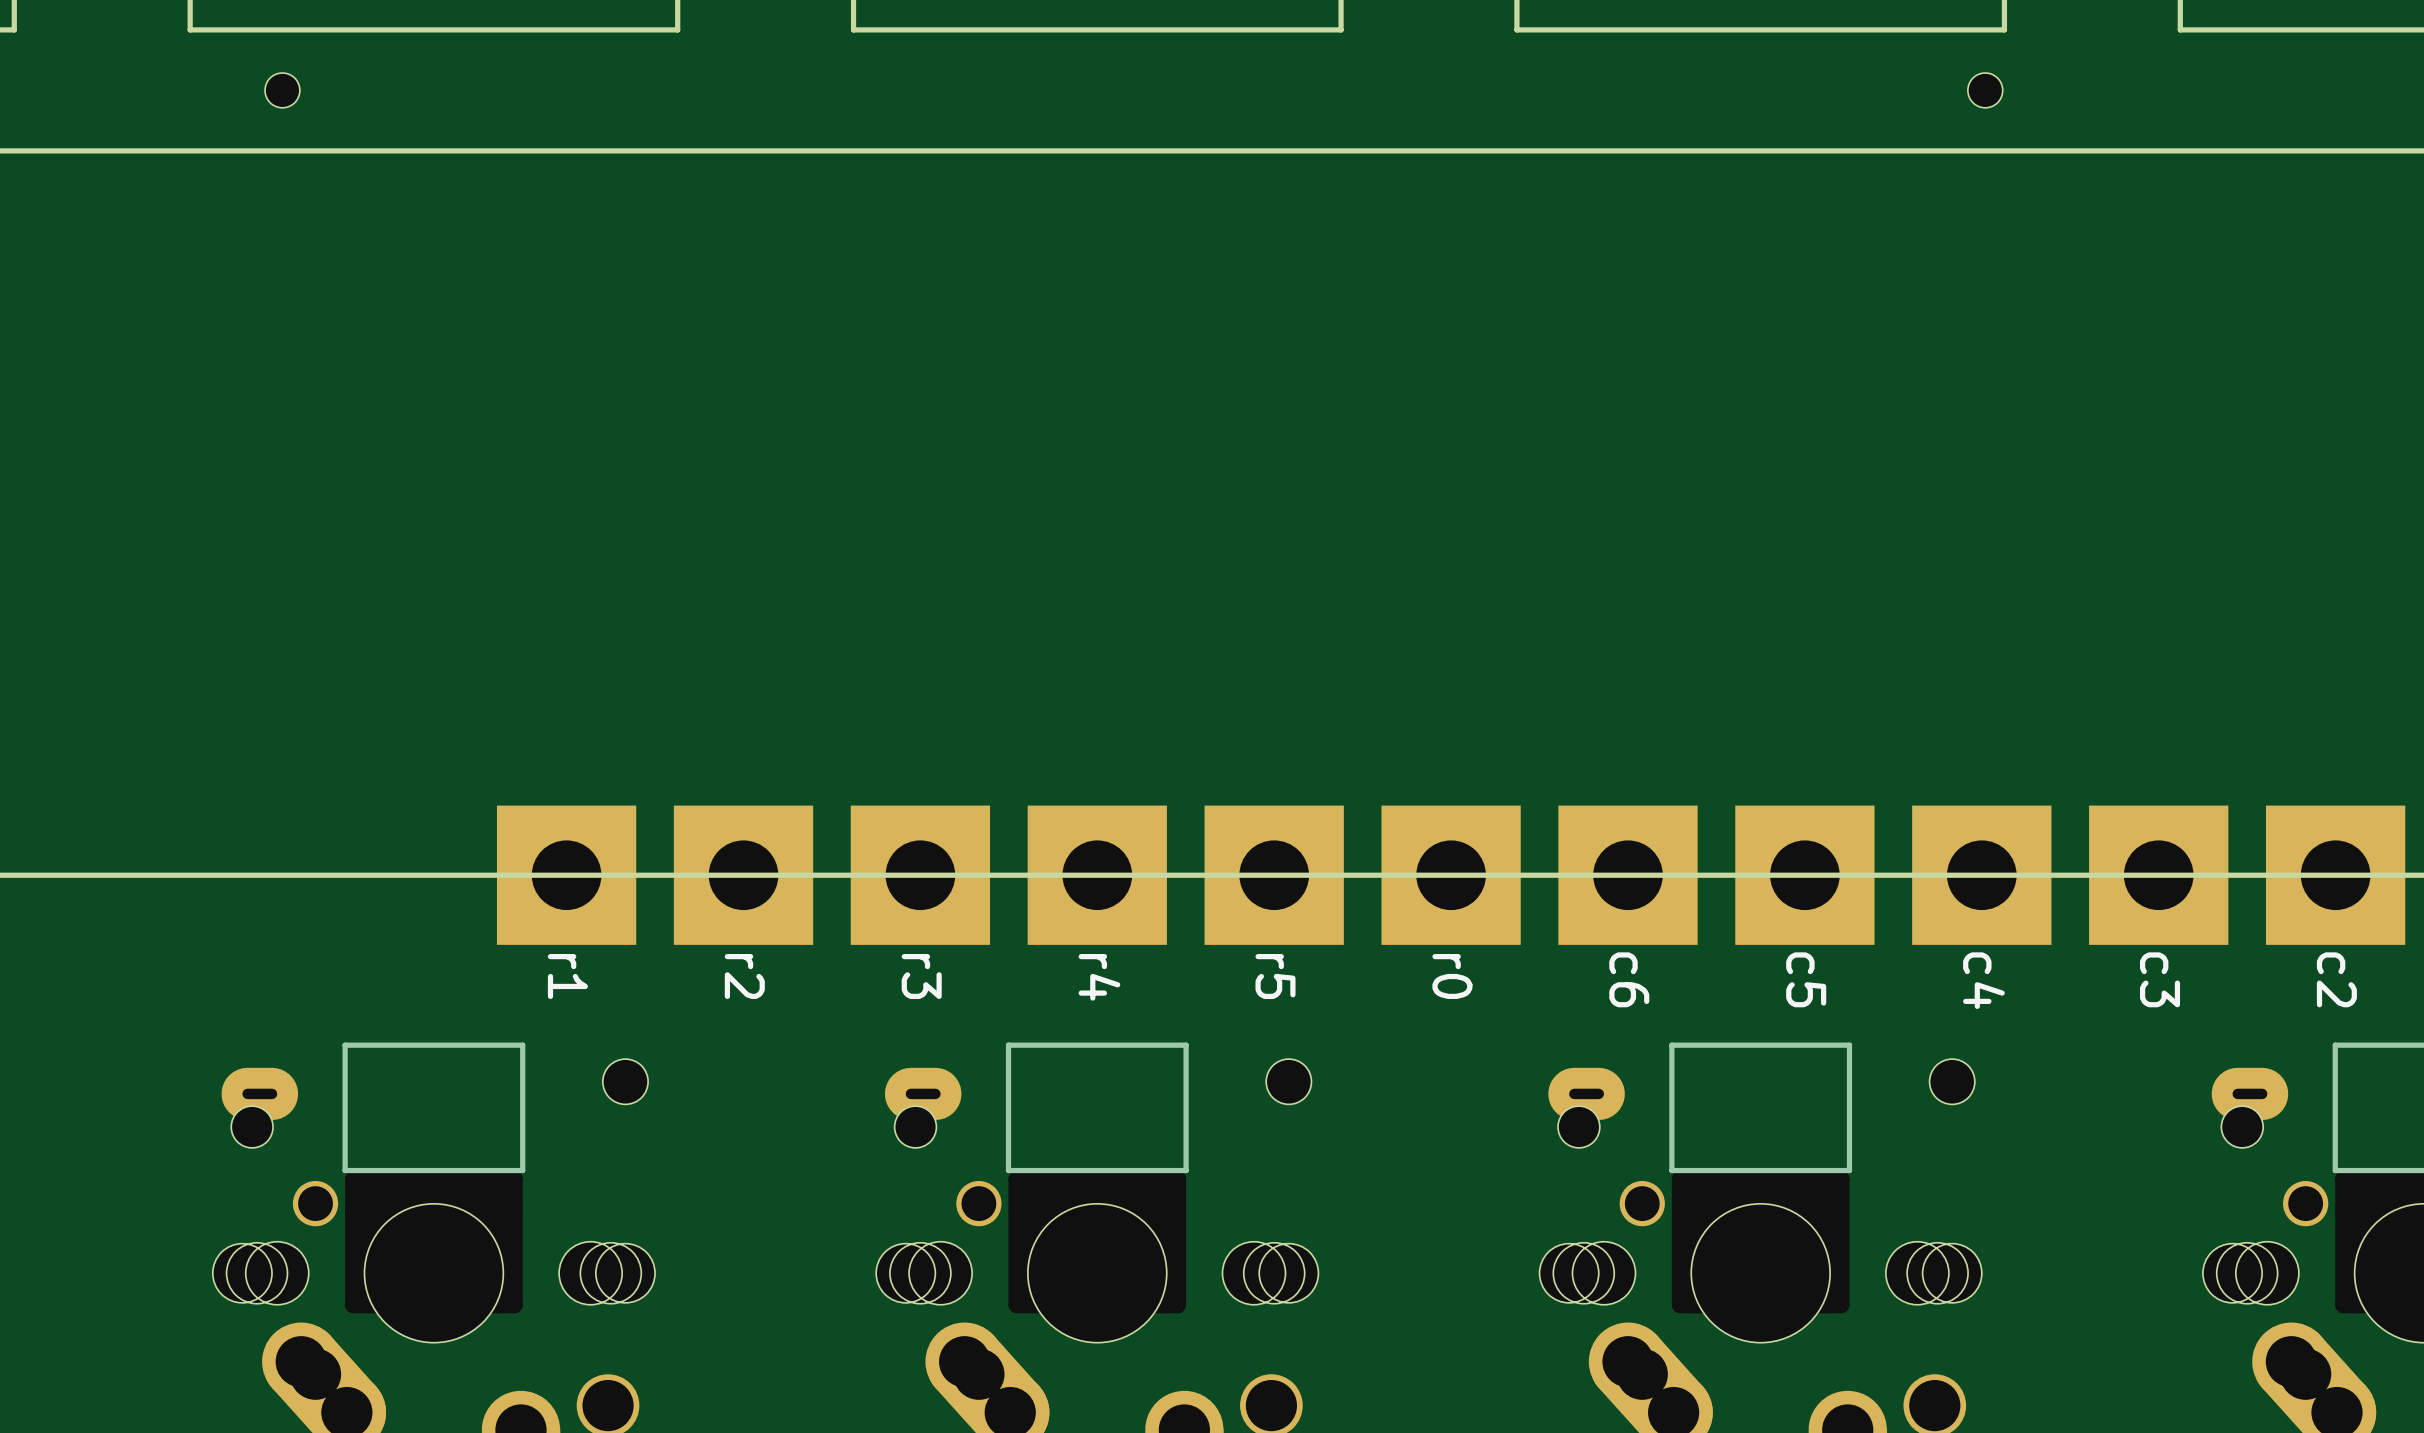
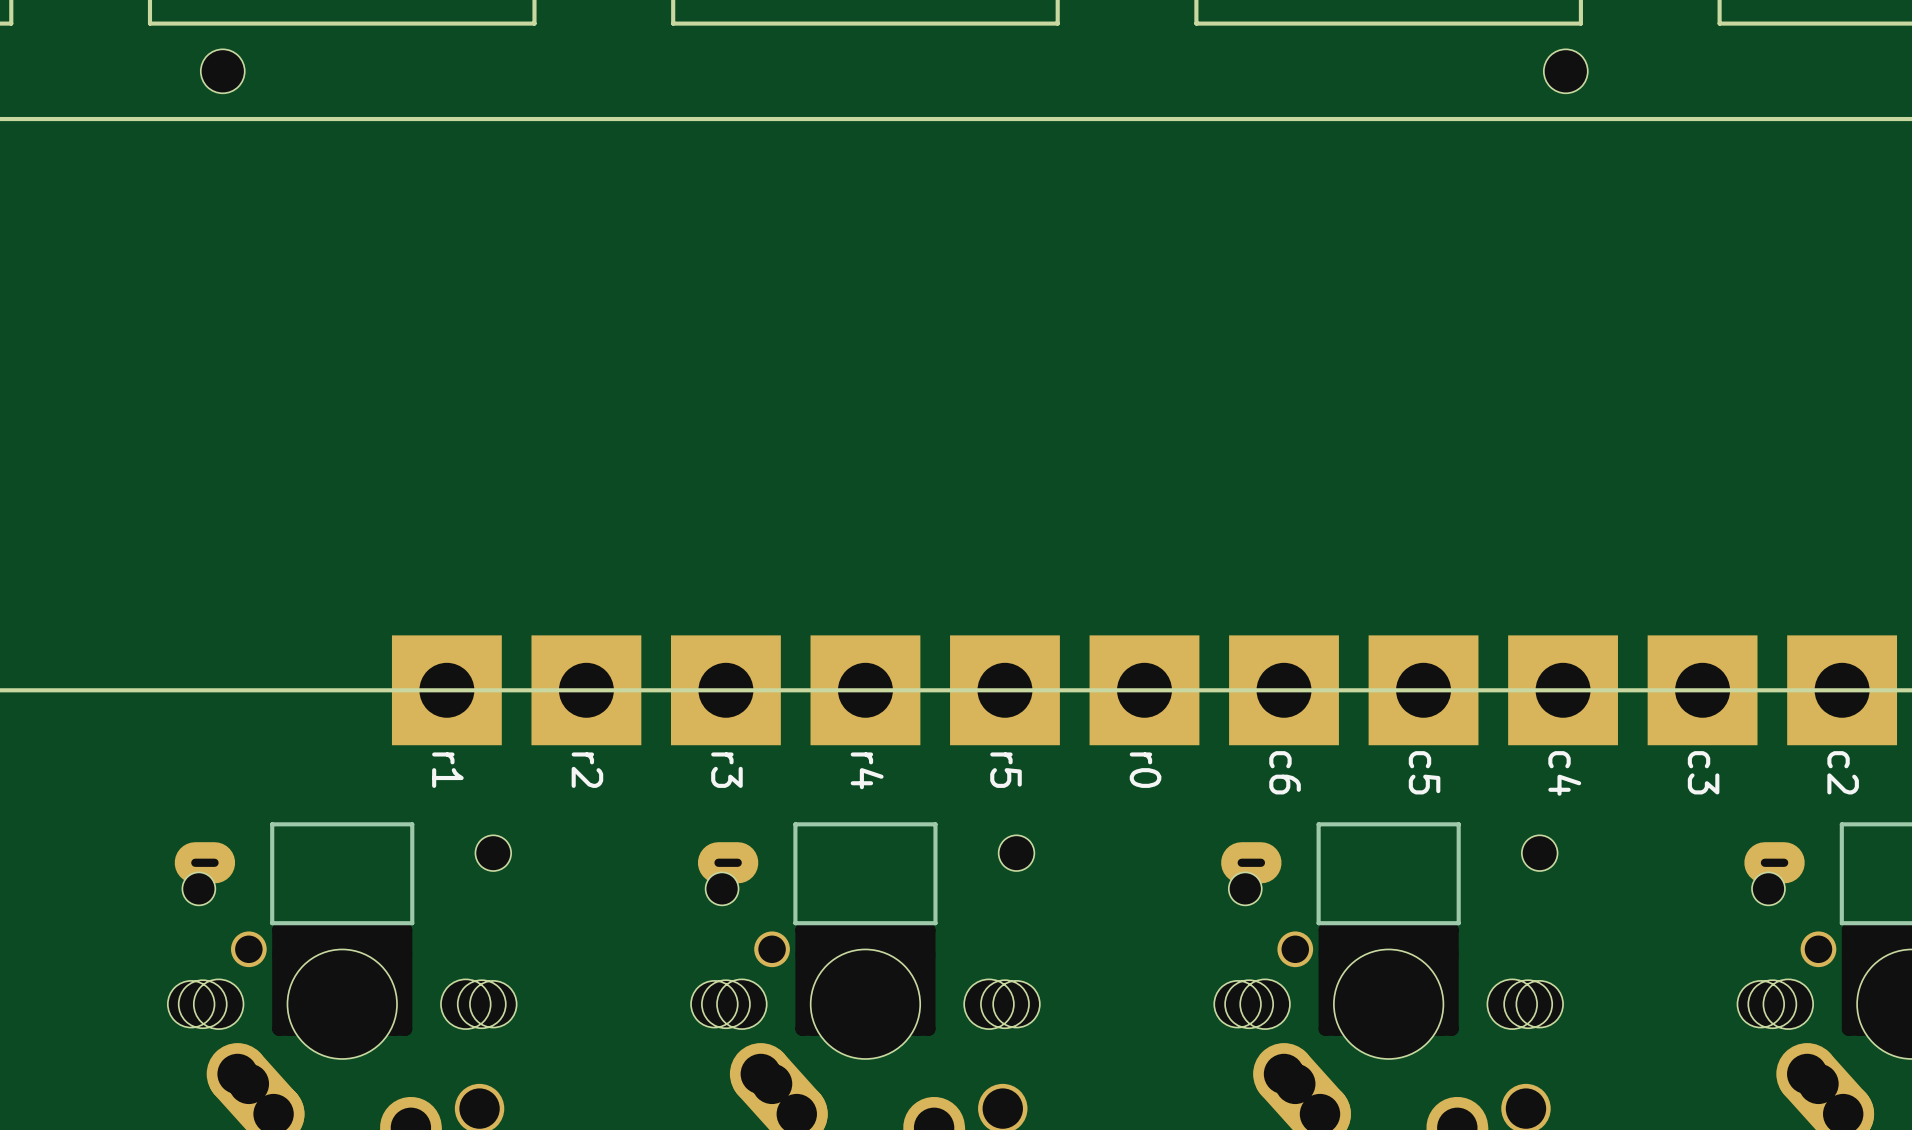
part footprint: [265, 73, 300, 108] -> [200, 49, 245, 94]
part footprint: [1967, 73, 2003, 108] -> [1543, 49, 1588, 94]

